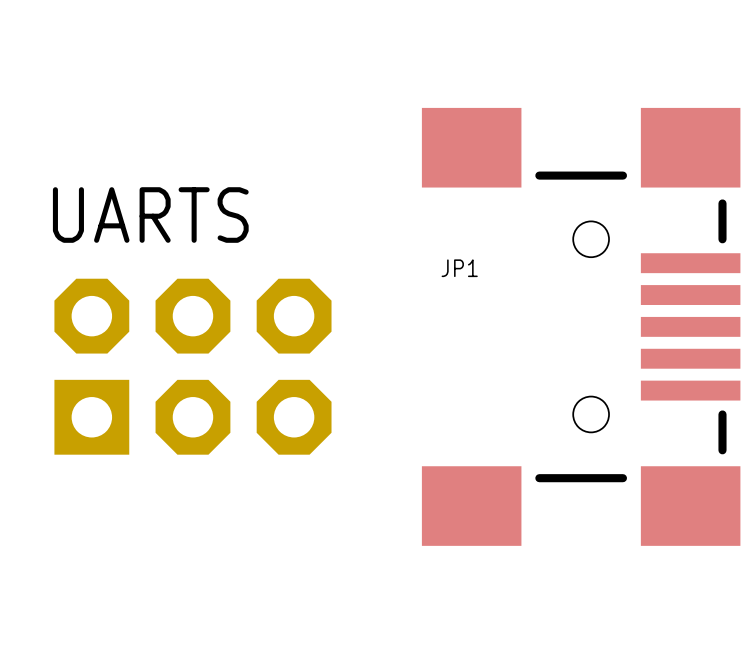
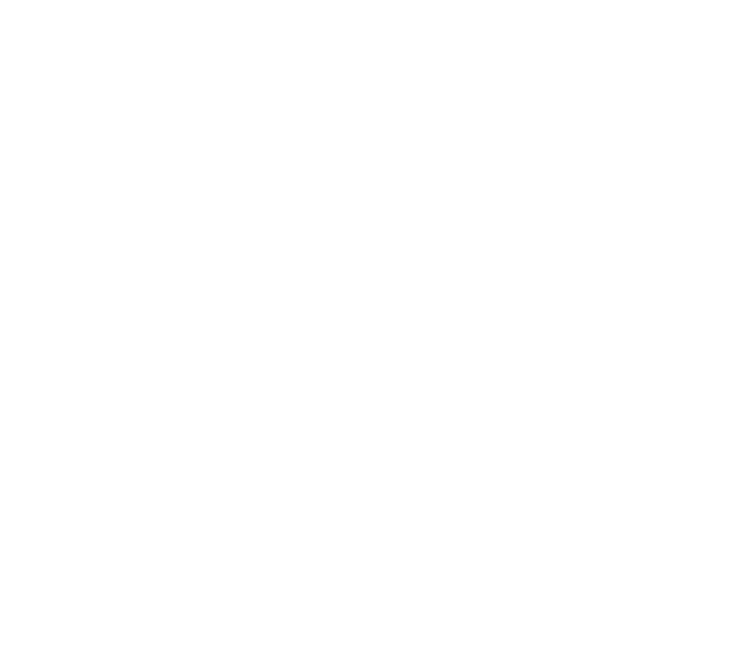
JP1: (581, 326) -> none
UARTS: (192, 366) -> none

